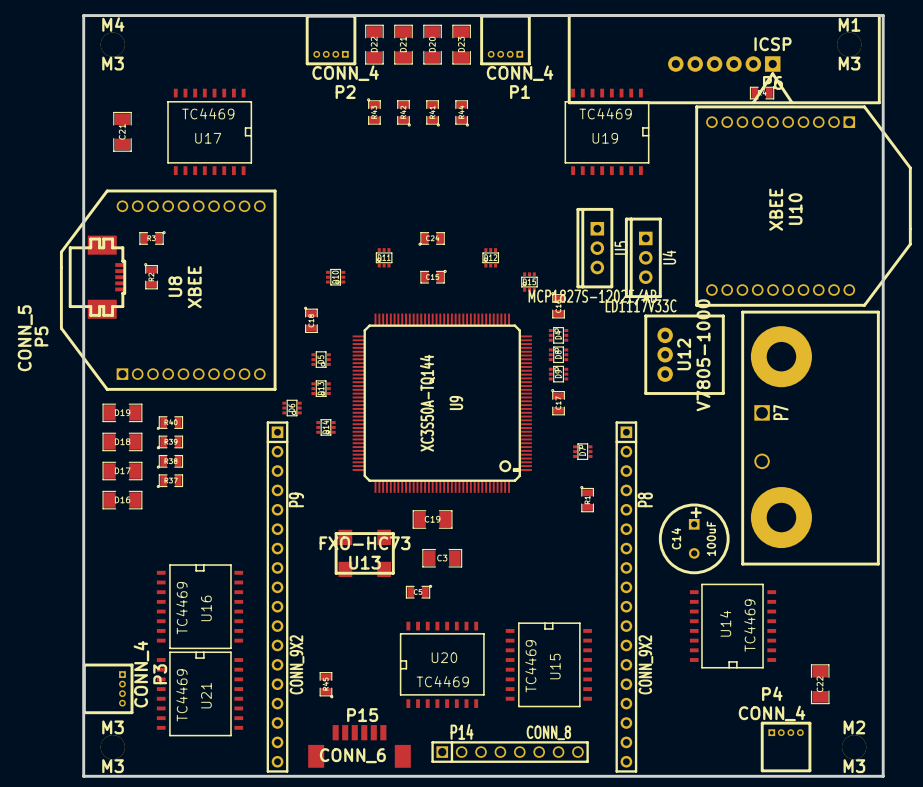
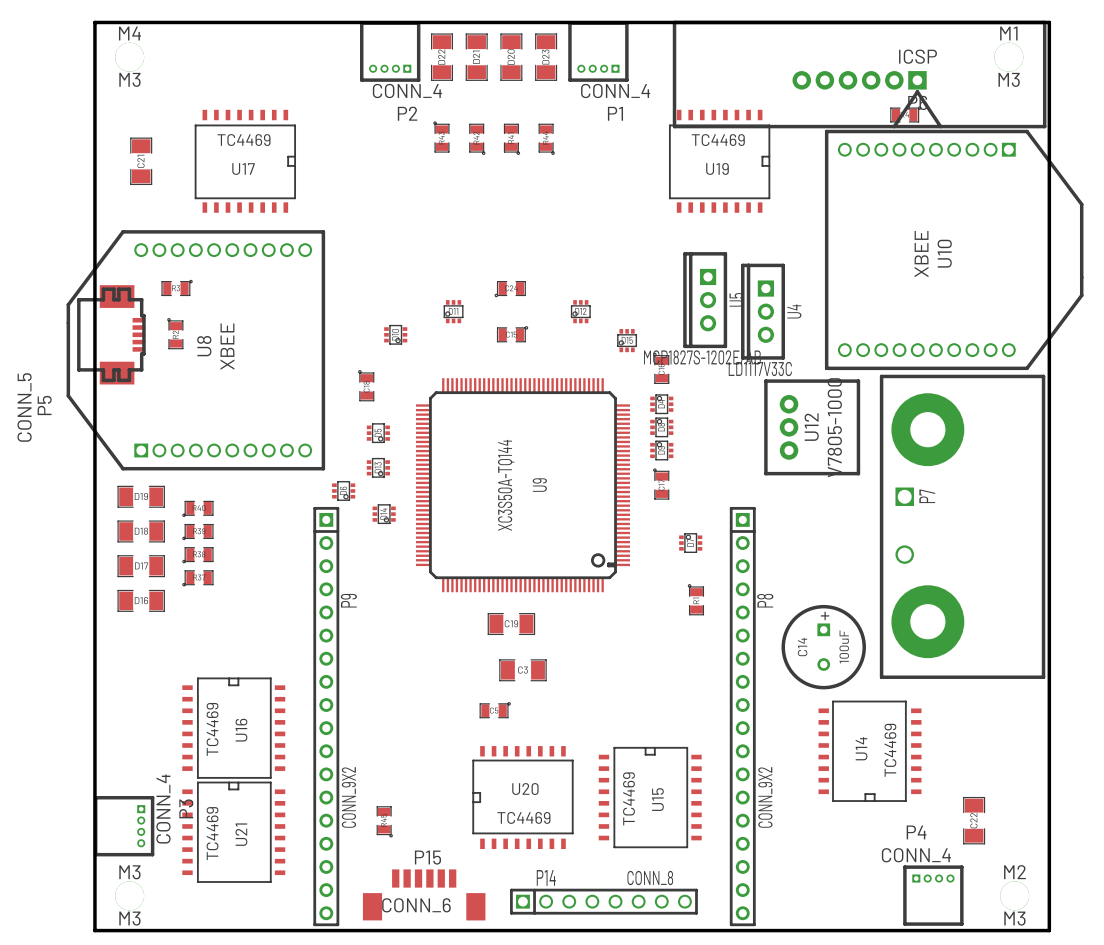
U13: FXO-HC73 (364, 553) -> none

